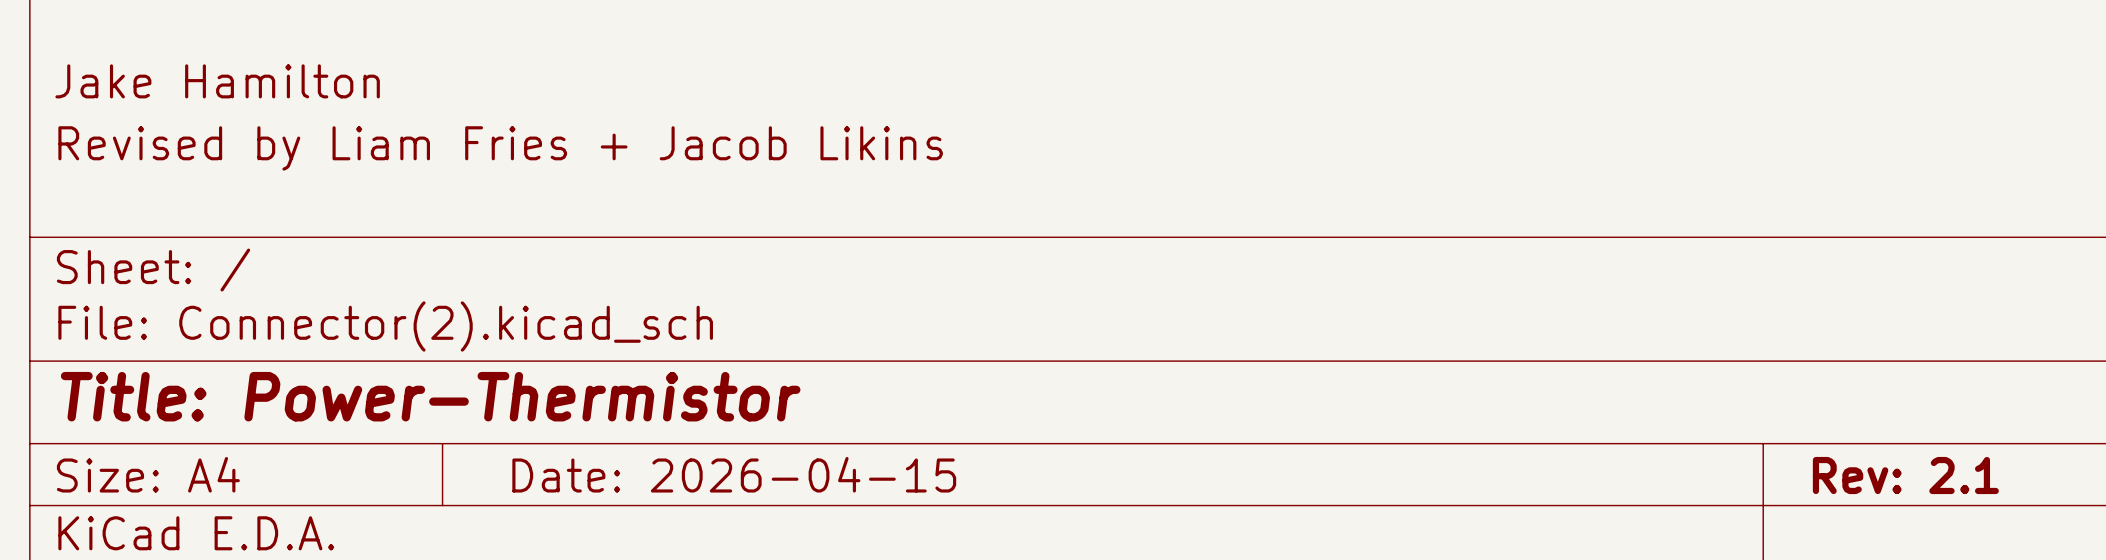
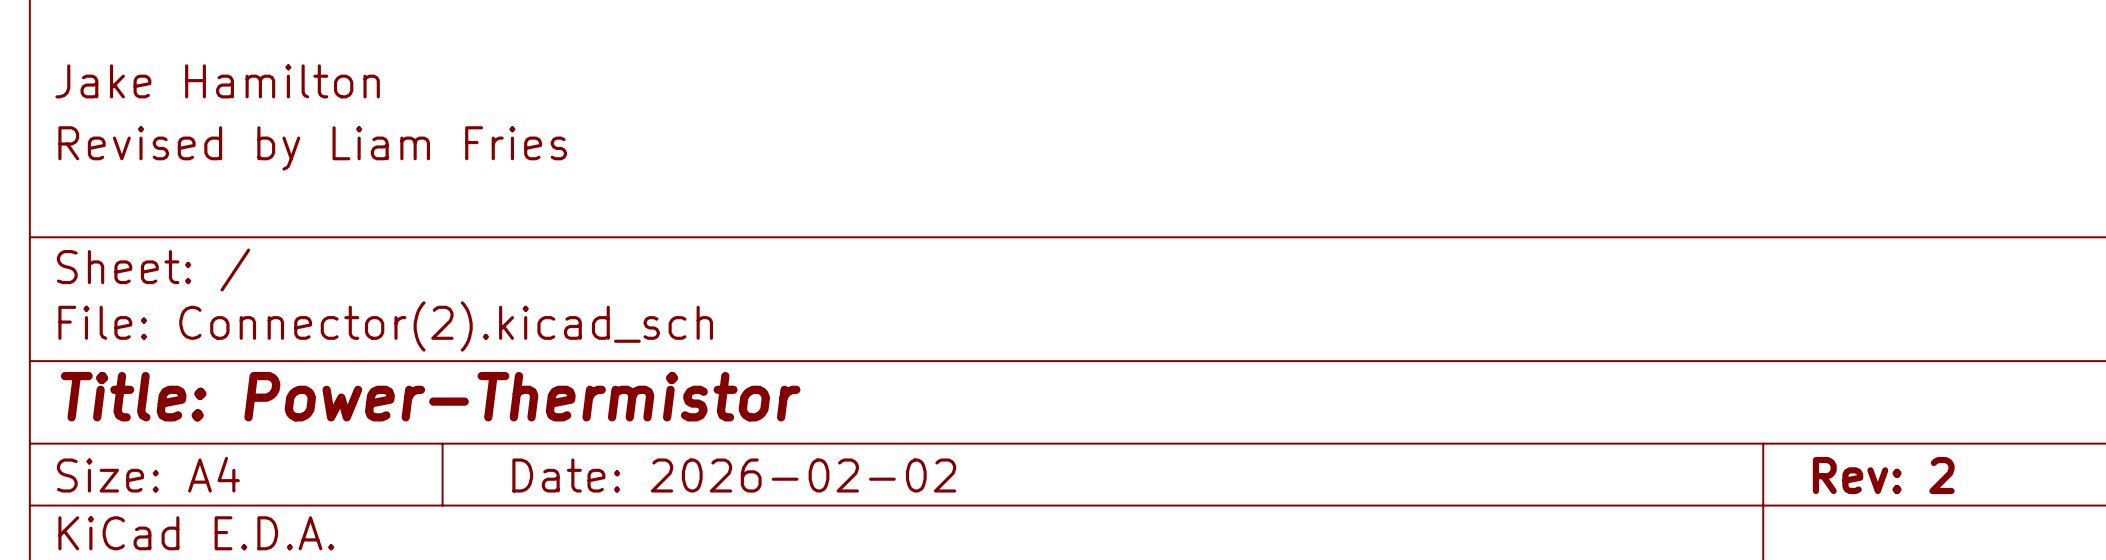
title block: Revised by Liam Fries + Jacob Likins (500, 148) -> Revised by Liam Fries (312, 148)
title block: Date: 2026-04-15 (734, 474) -> Date: 2026-02-02 (734, 475)
title block: Rev: 2.1 (1905, 475) -> Rev: 2 (1883, 475)

